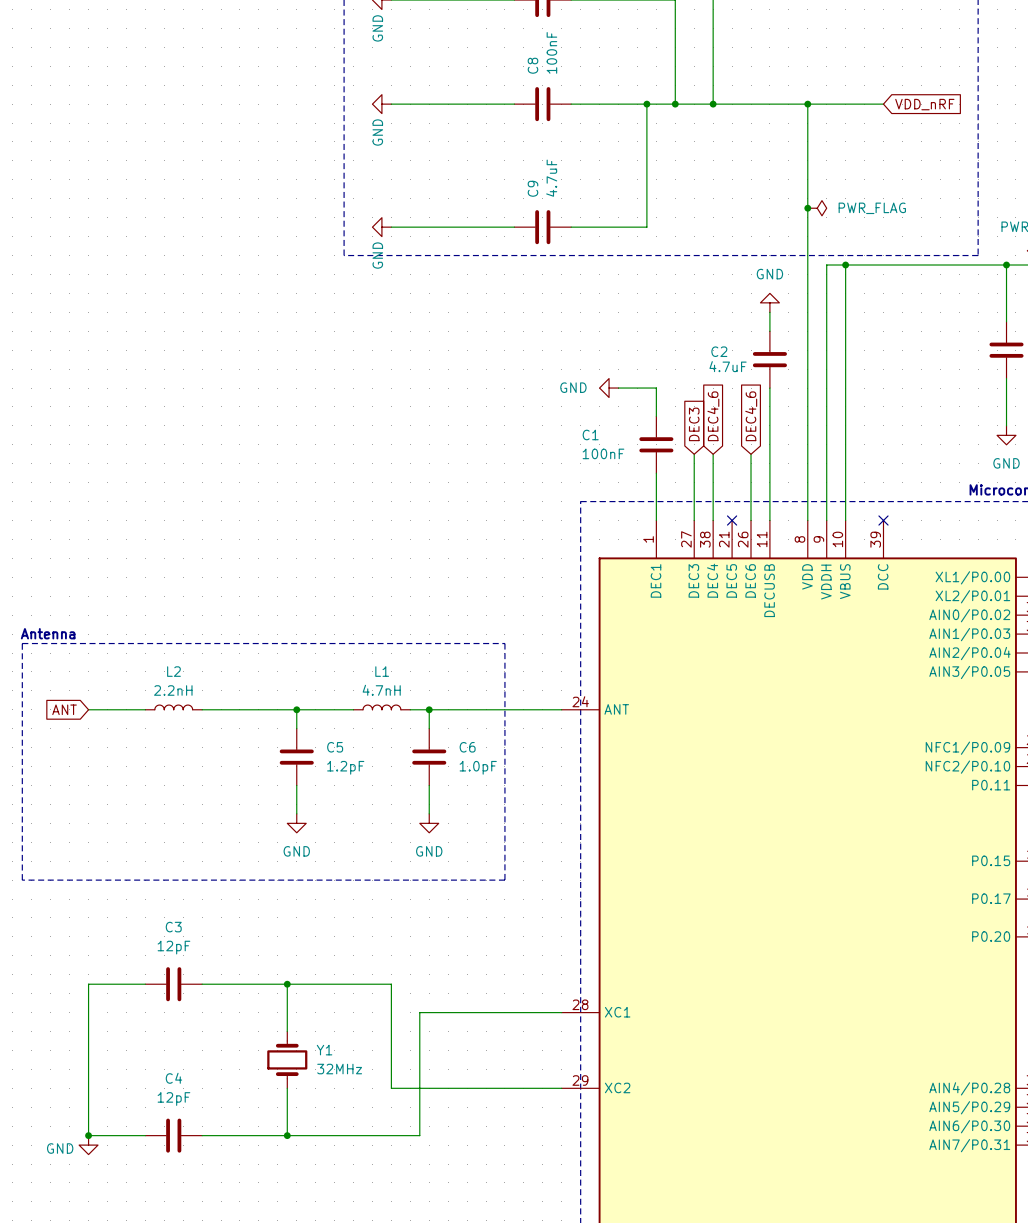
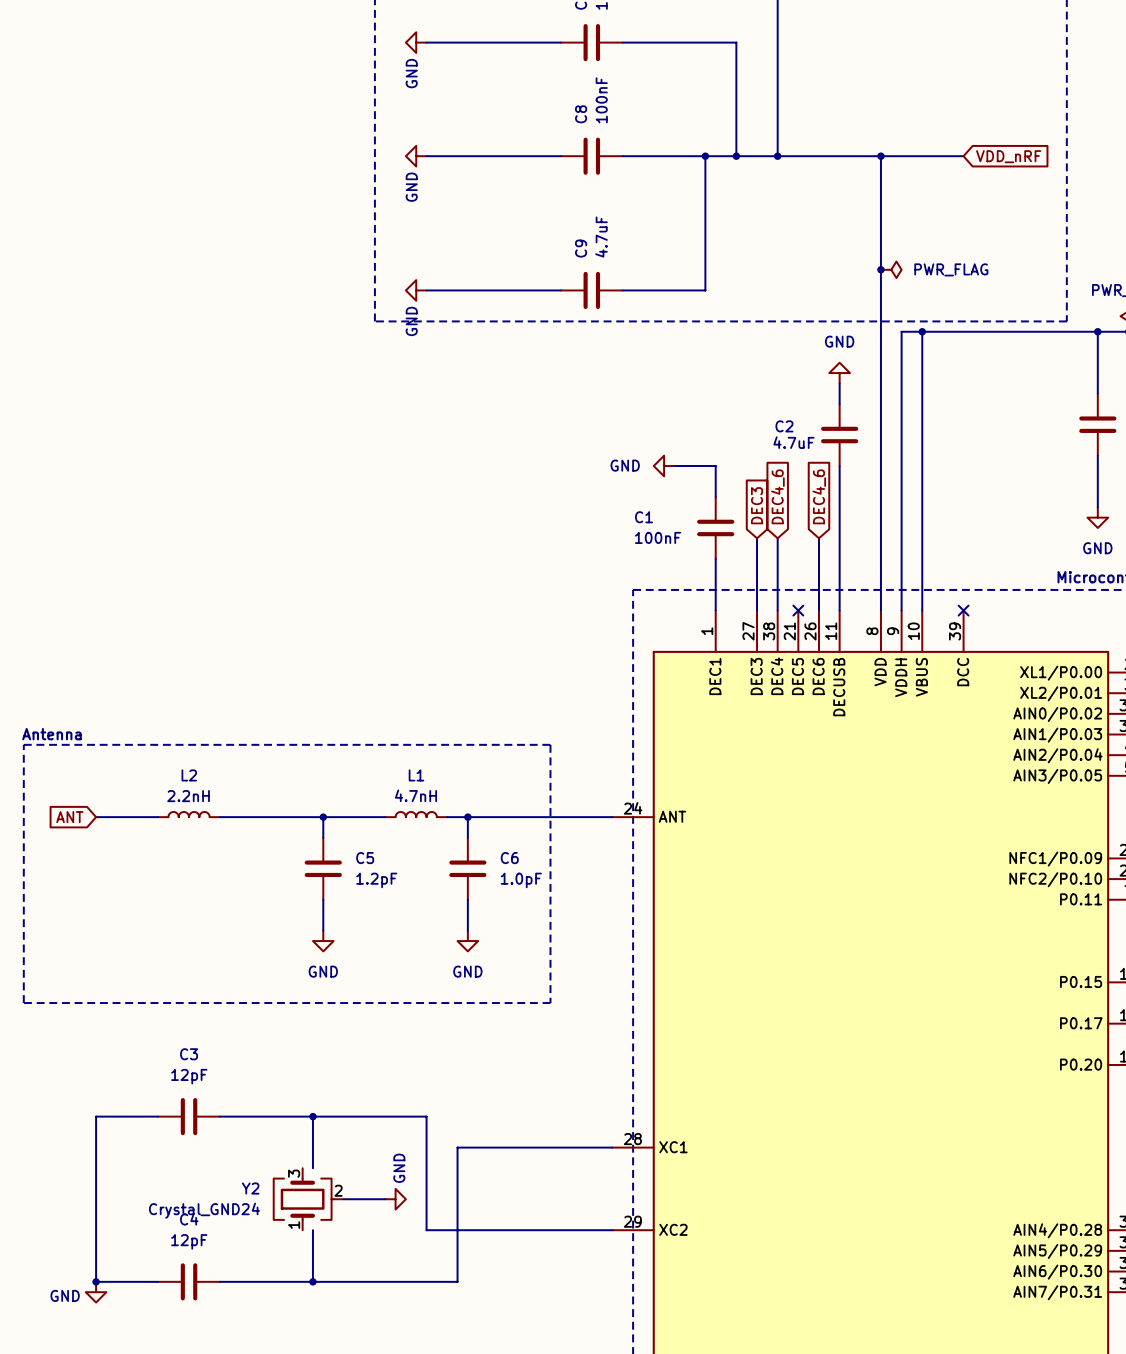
Y2: none -> Crystal_GND24 (308, 1199)
Y1: 32MHz (287, 1059) -> none
wire: none -> (343, 1199) (385, 1199)
power symbol: none -> GND (395, 1199)

